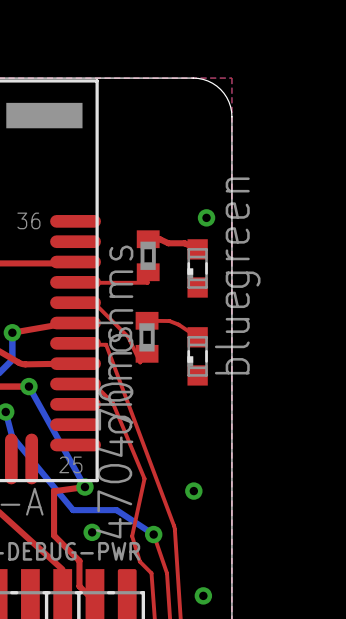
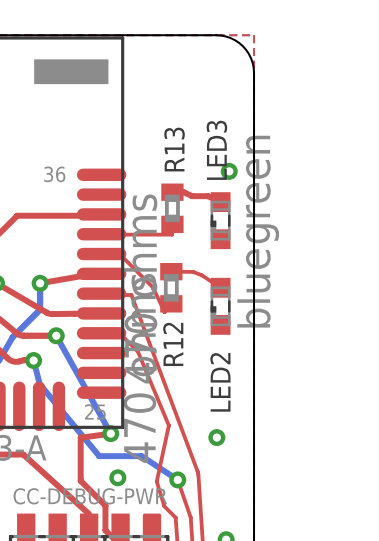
LED3 name: none -> LED3 (216, 150)
R13 name: none -> R13 (174, 149)
R12 name: none -> R12 (173, 344)
LED2 name: none -> LED2 (220, 382)

